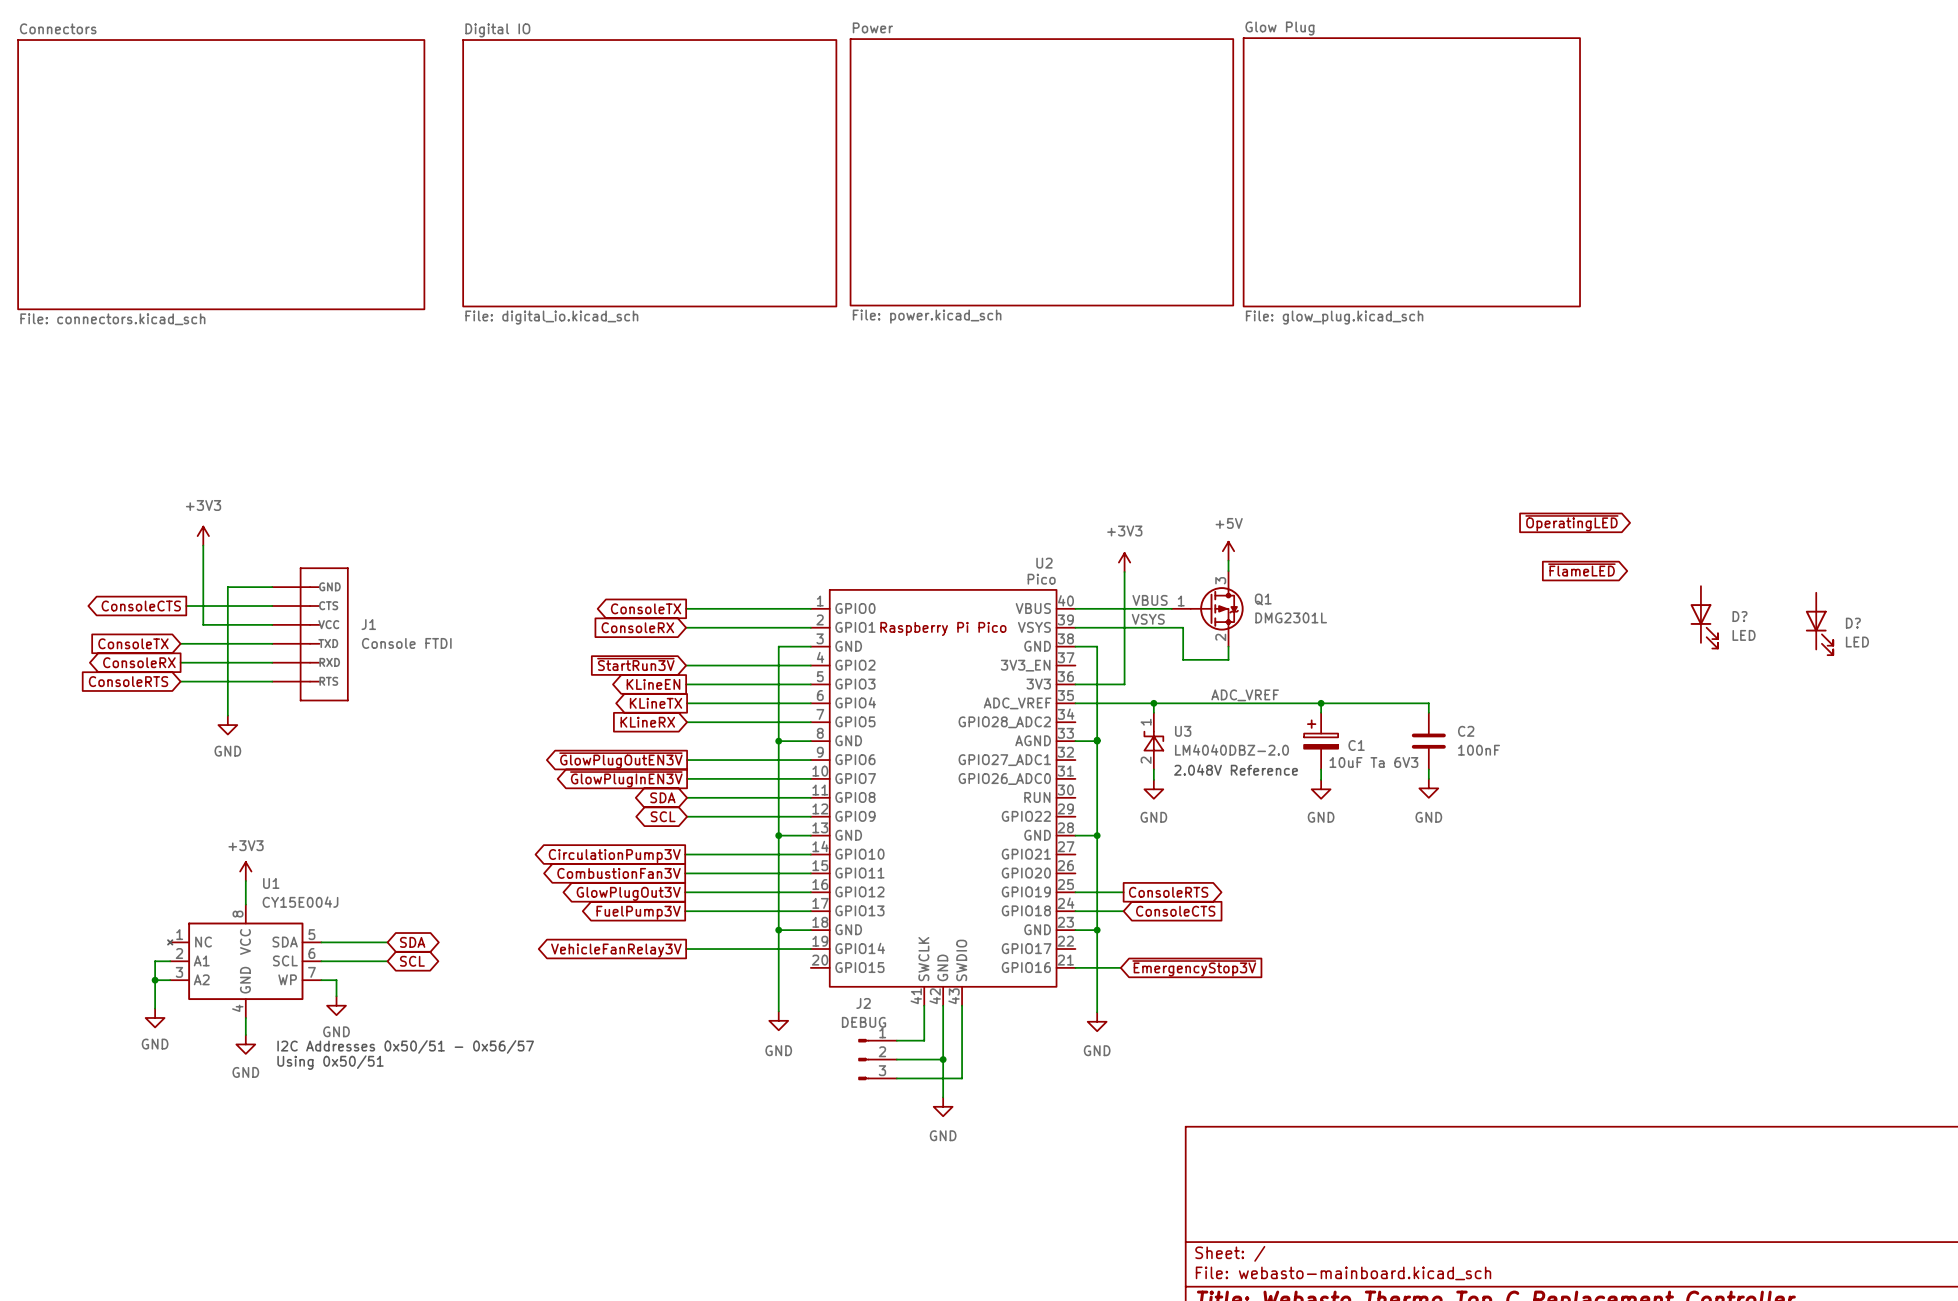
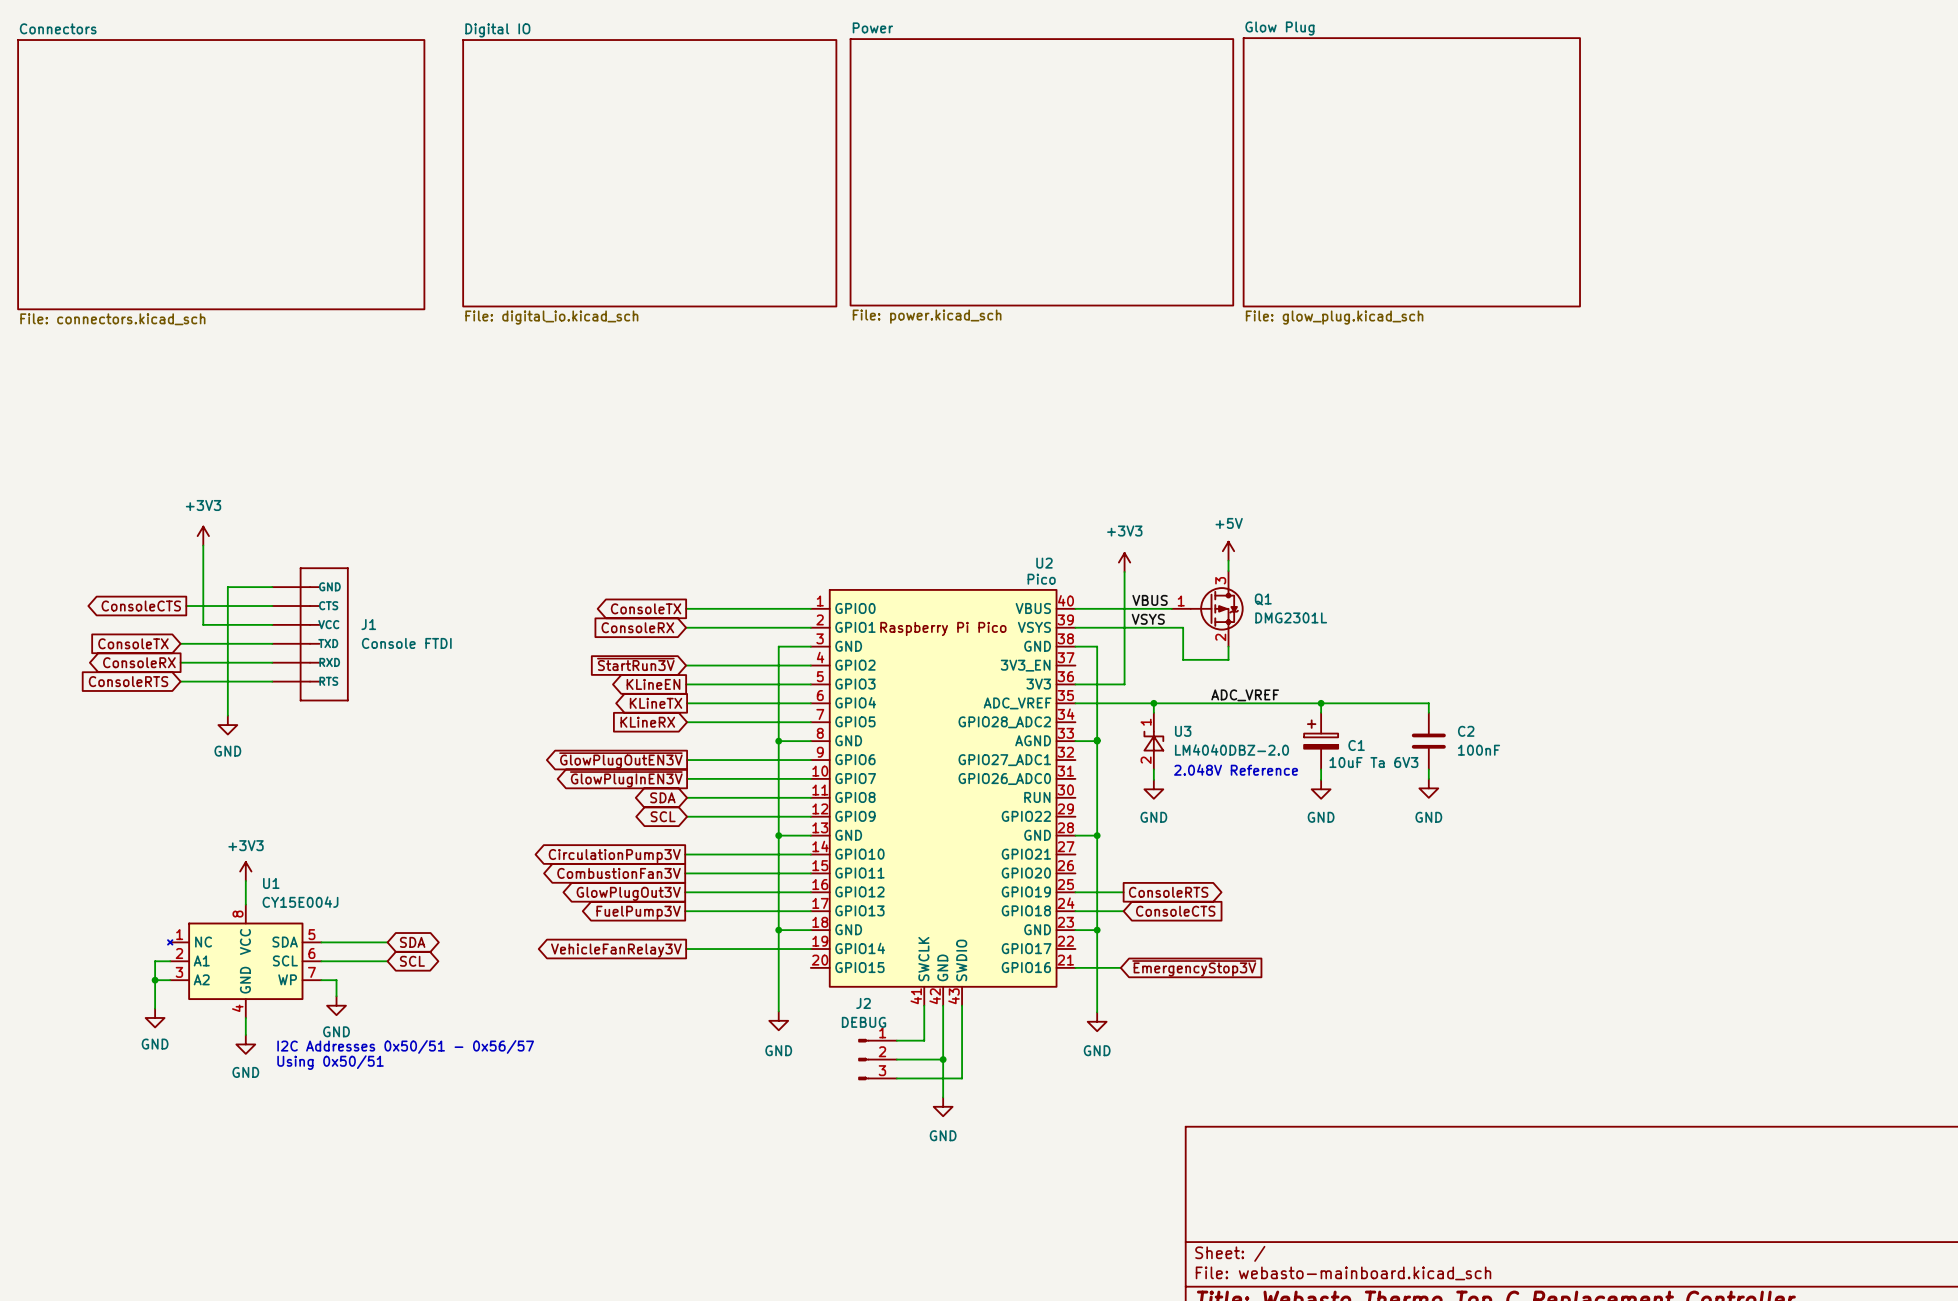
global label: ~{OperatingLED} (1571, 523) -> none
global label: ~{FlameLED} (1581, 569) -> none
D?: LED (1704, 617) -> none
D?: LED (1819, 623) -> none

